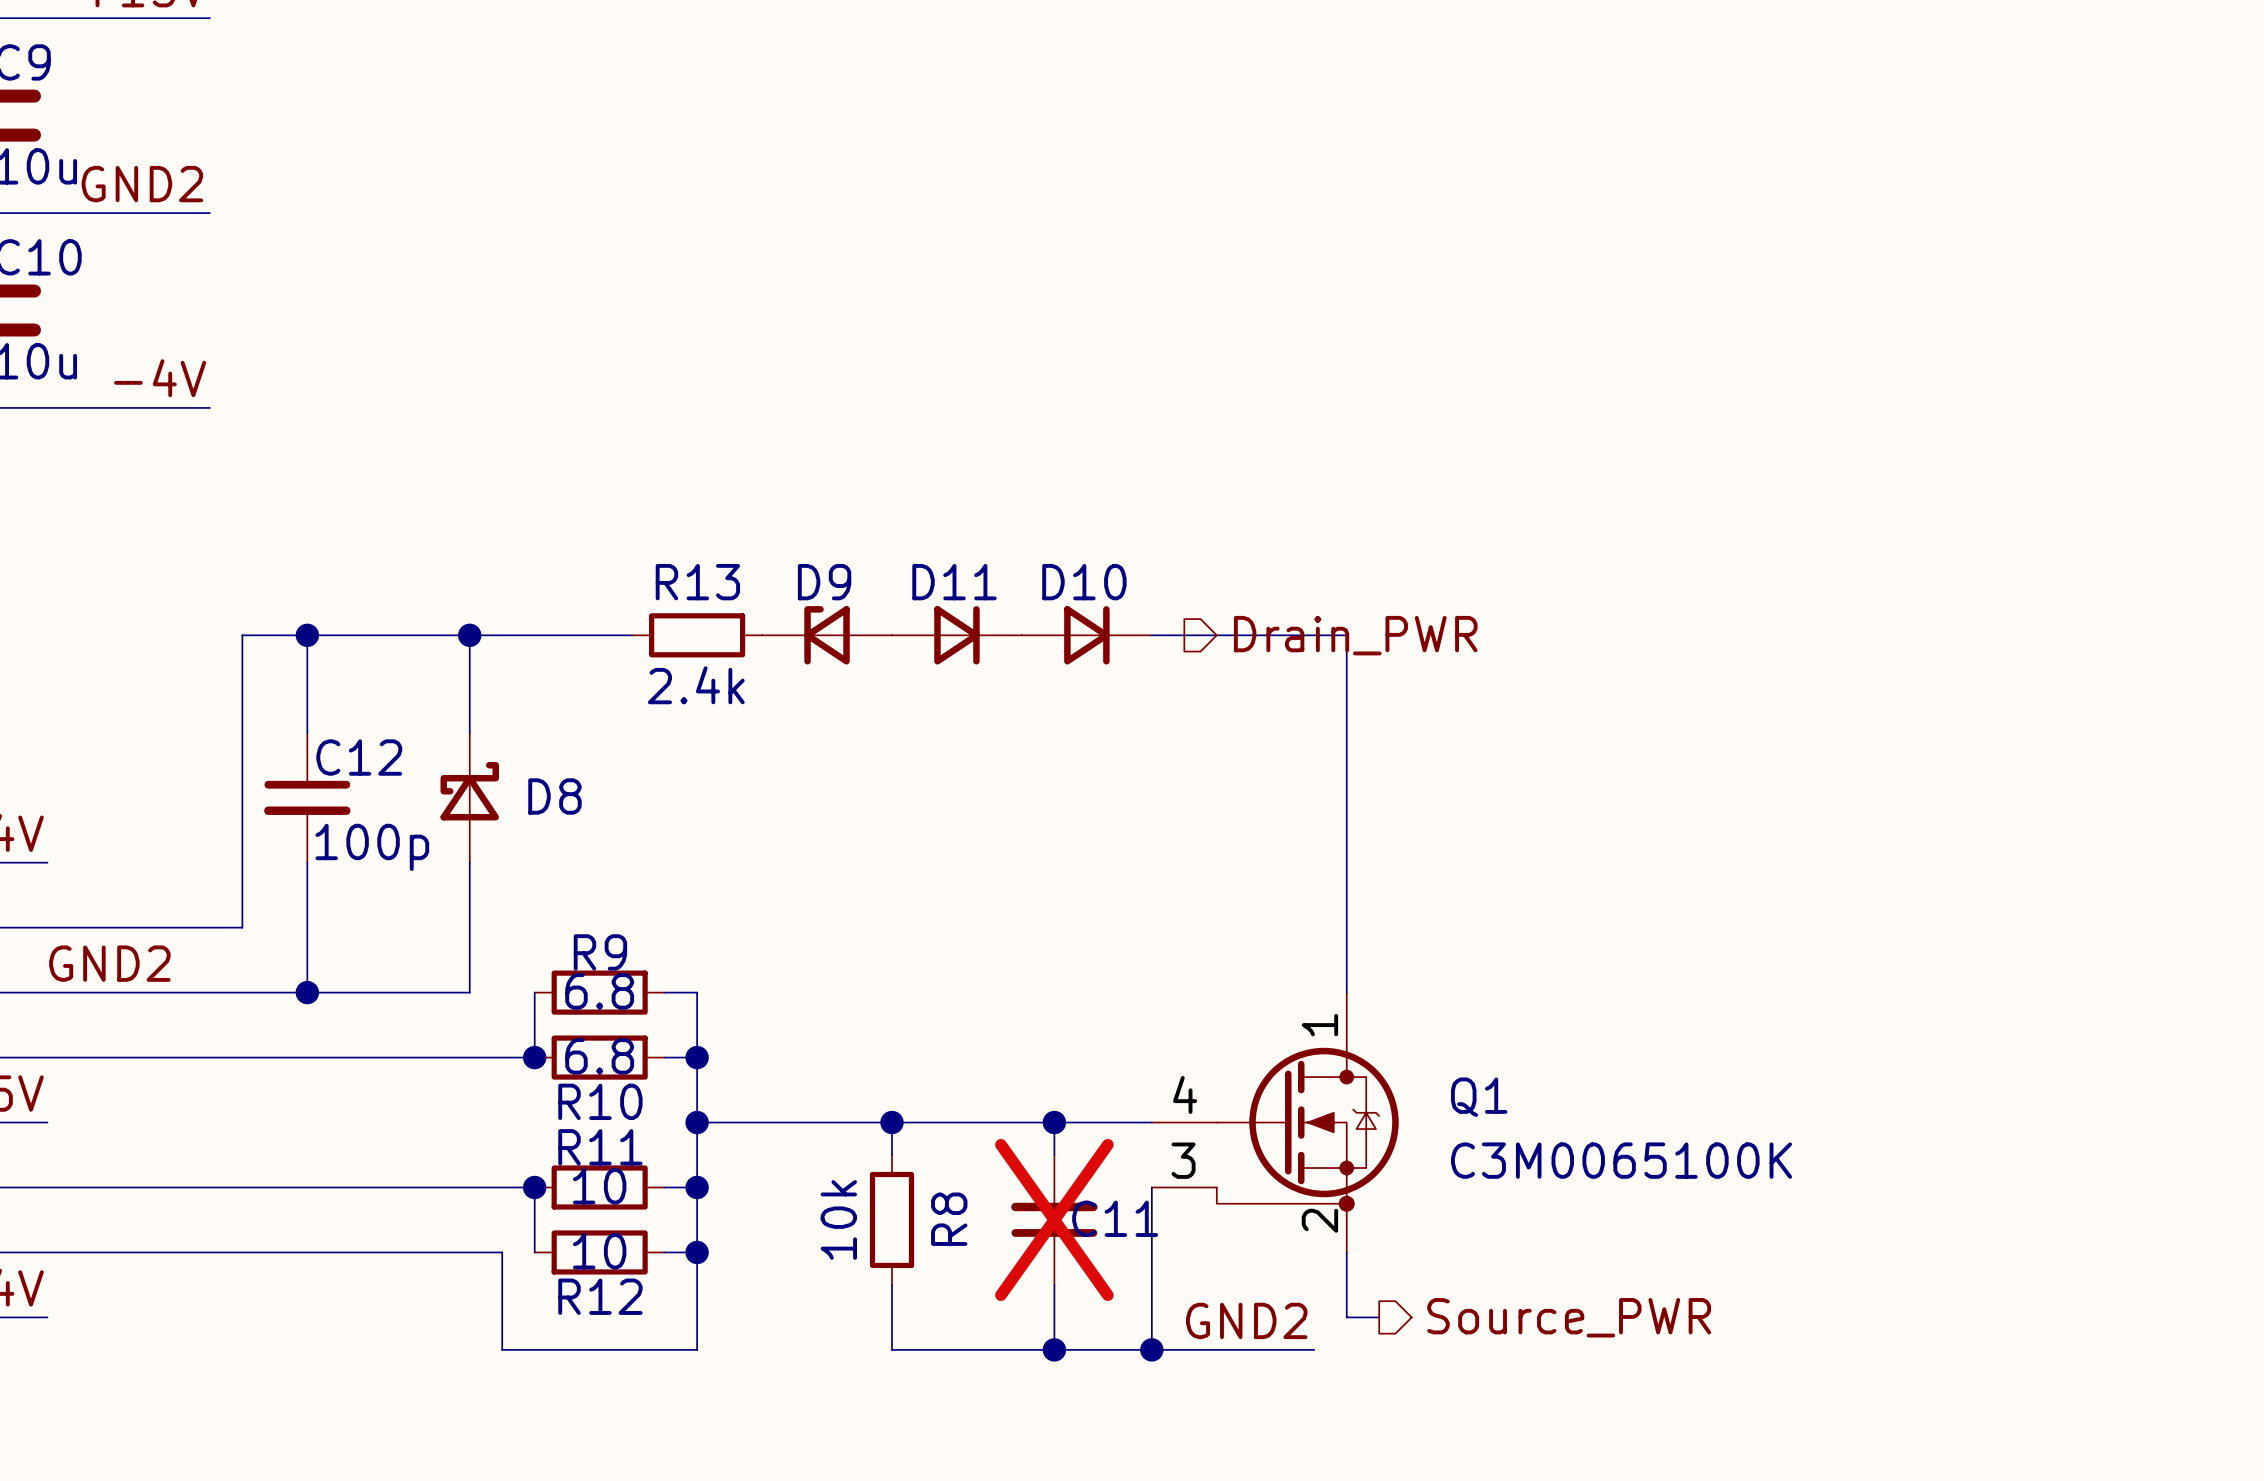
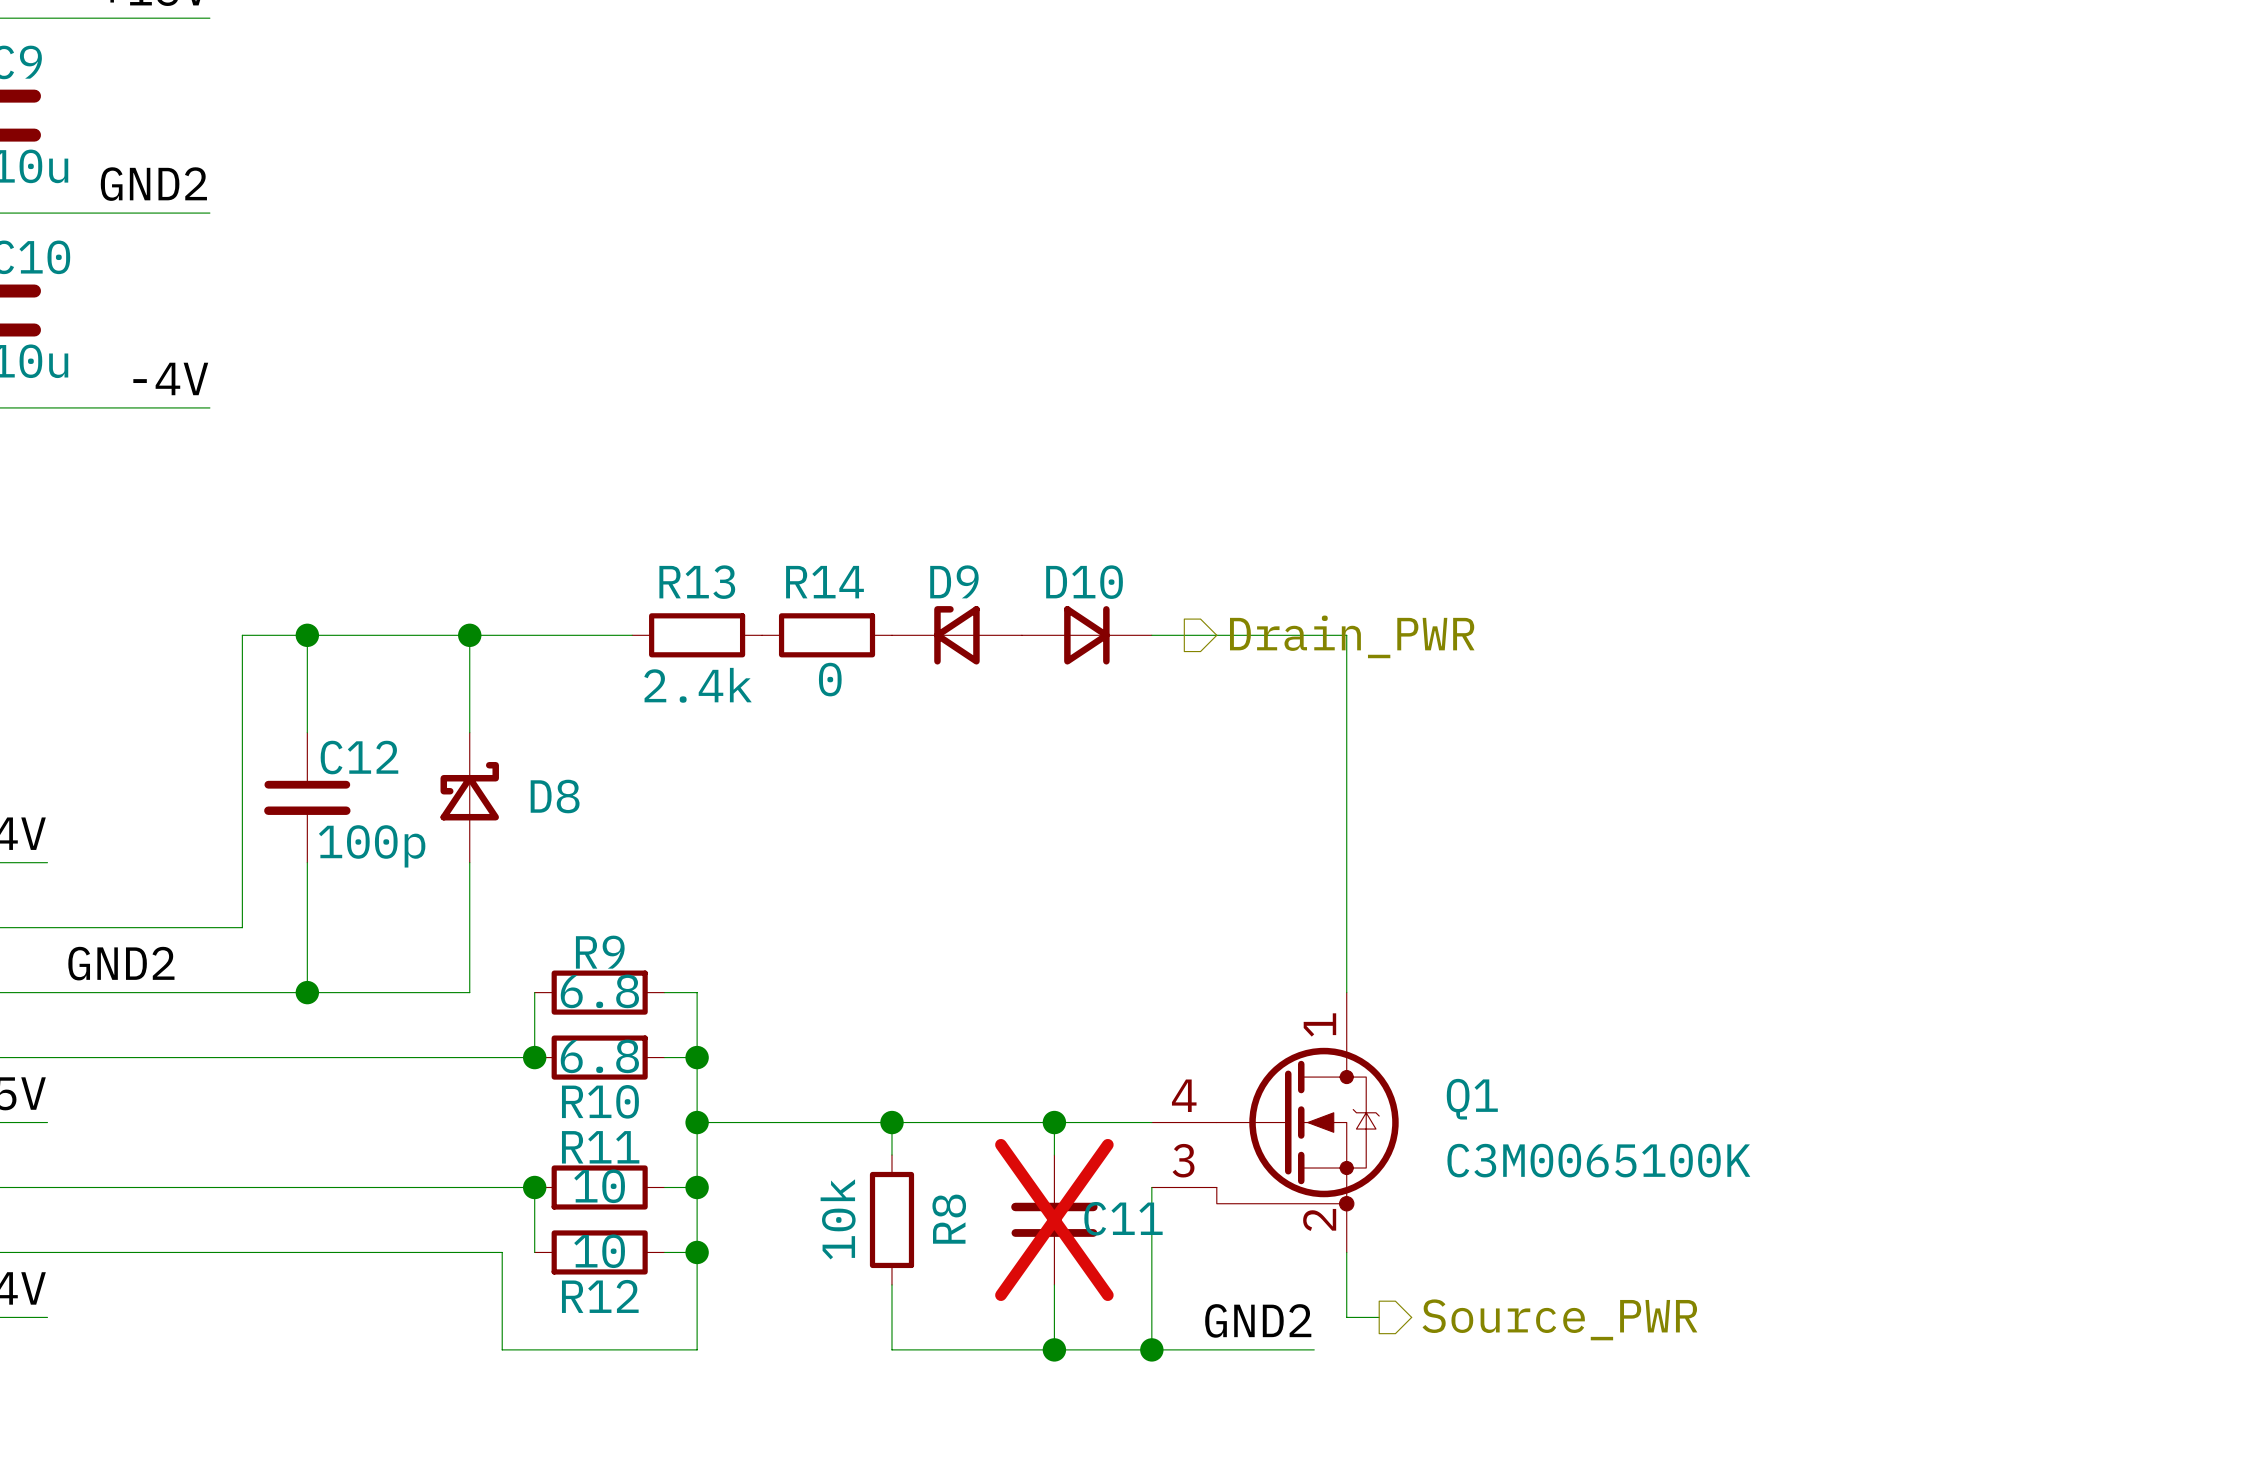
D9 position: (827, 635) -> (956, 635)
R14: none -> 0 (827, 635)
D11: (956, 635) -> none

